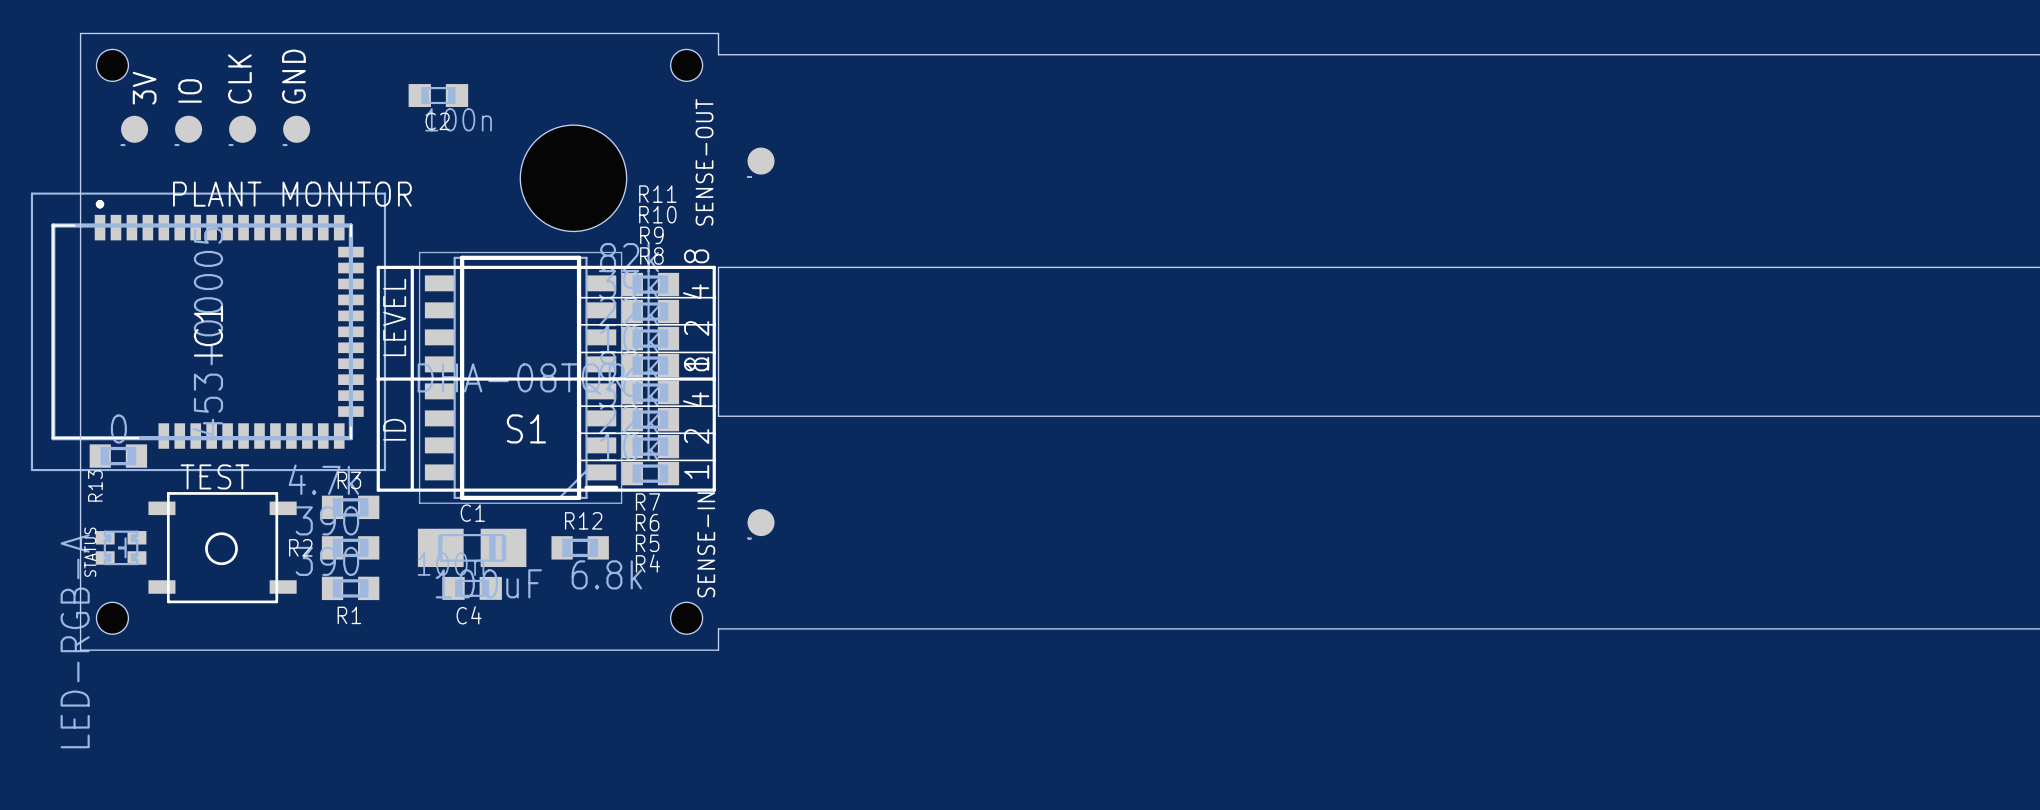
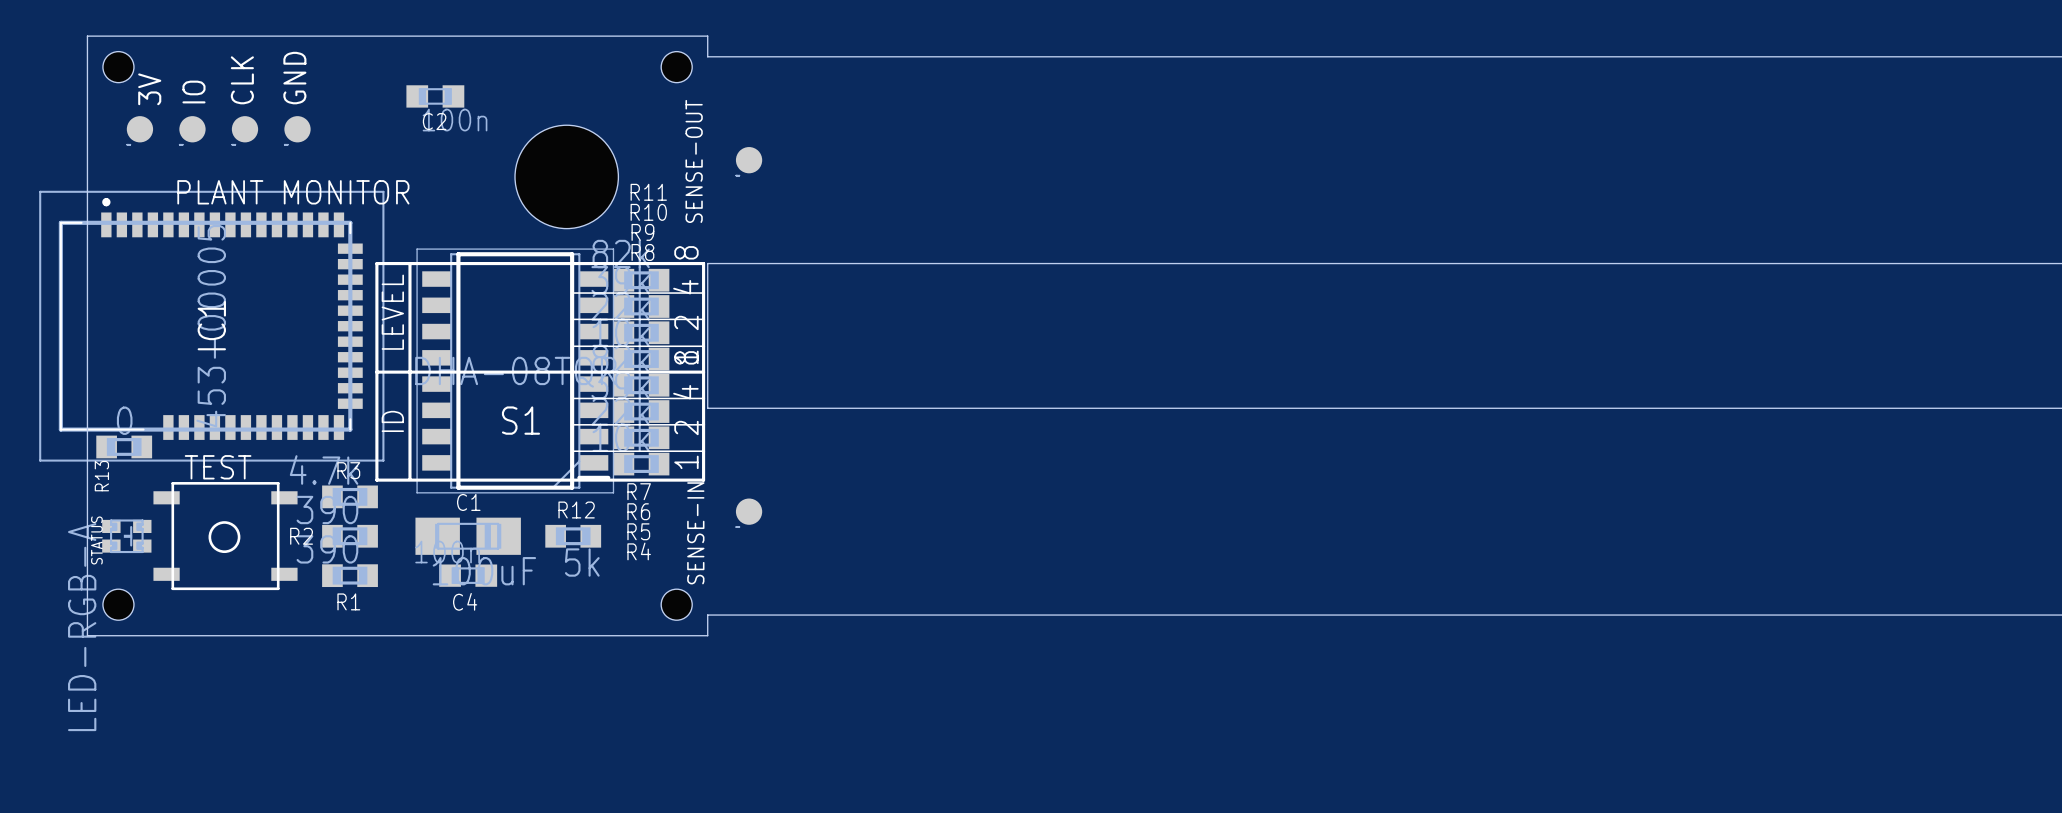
R12 value: 6.8k (606, 574) -> 5k (582, 562)

